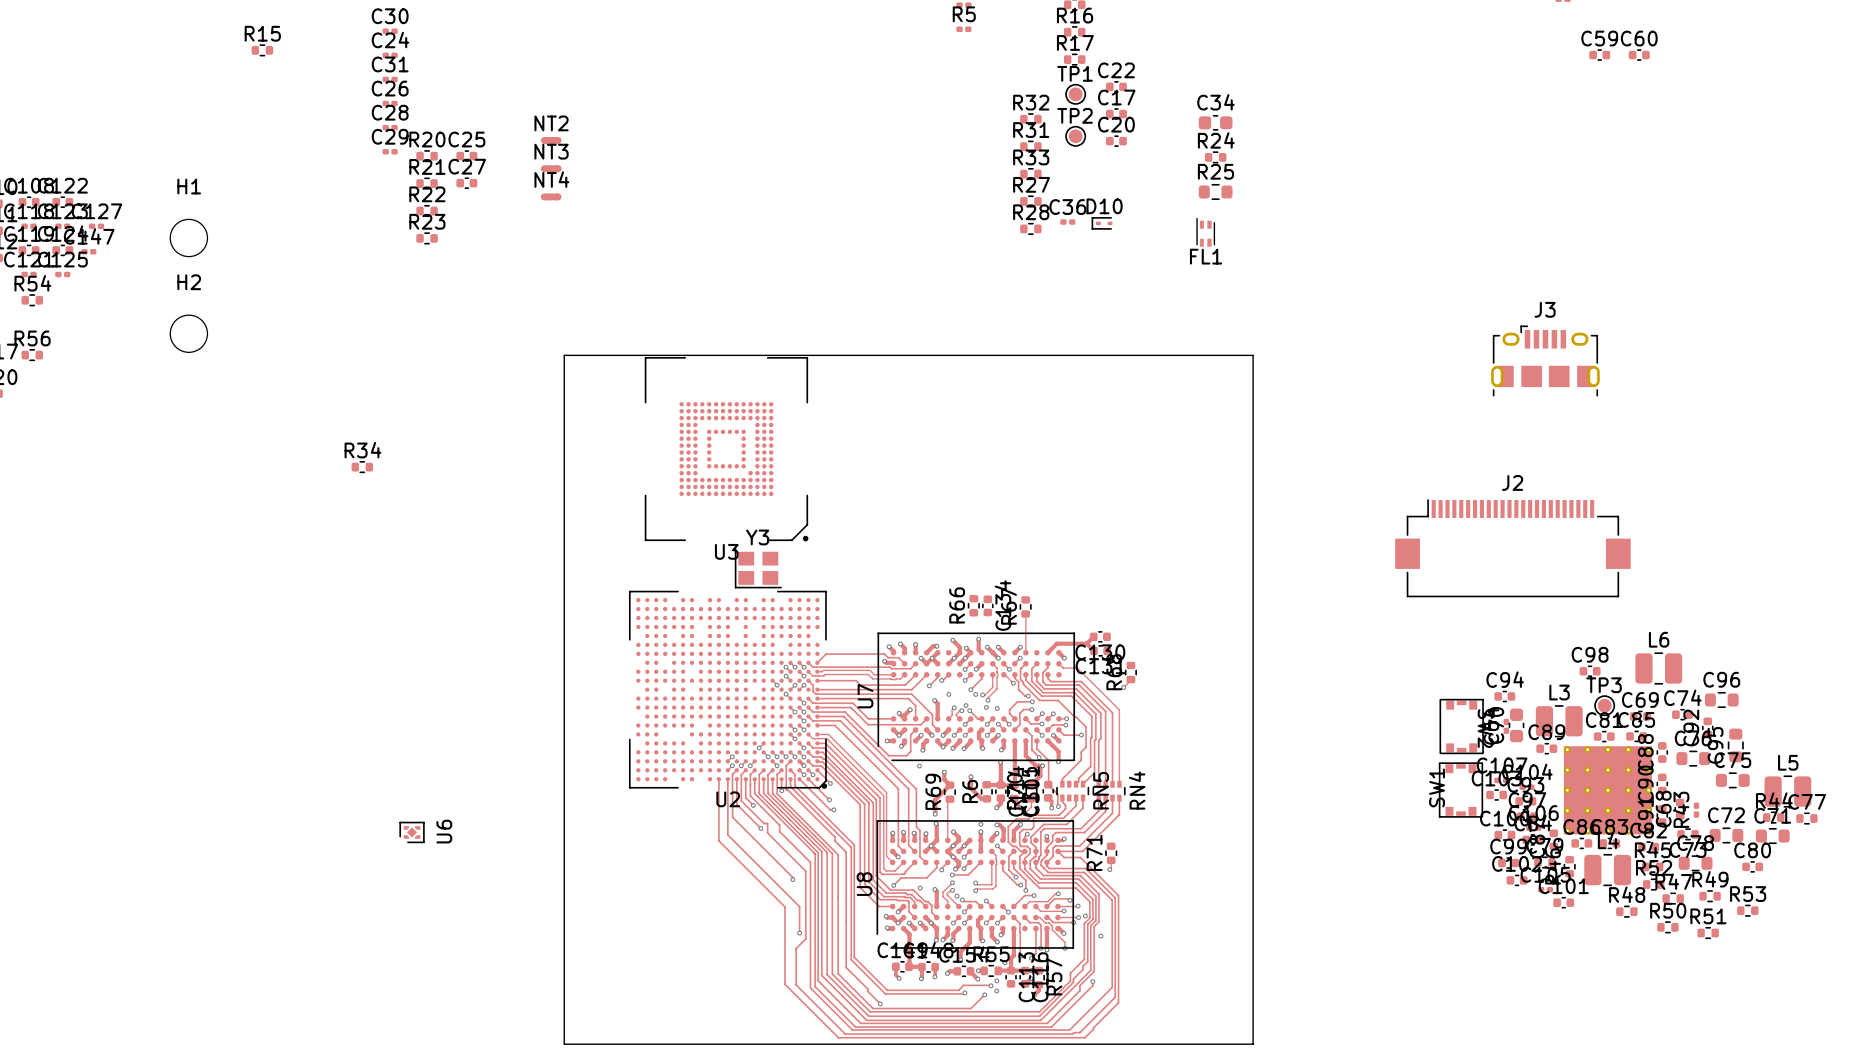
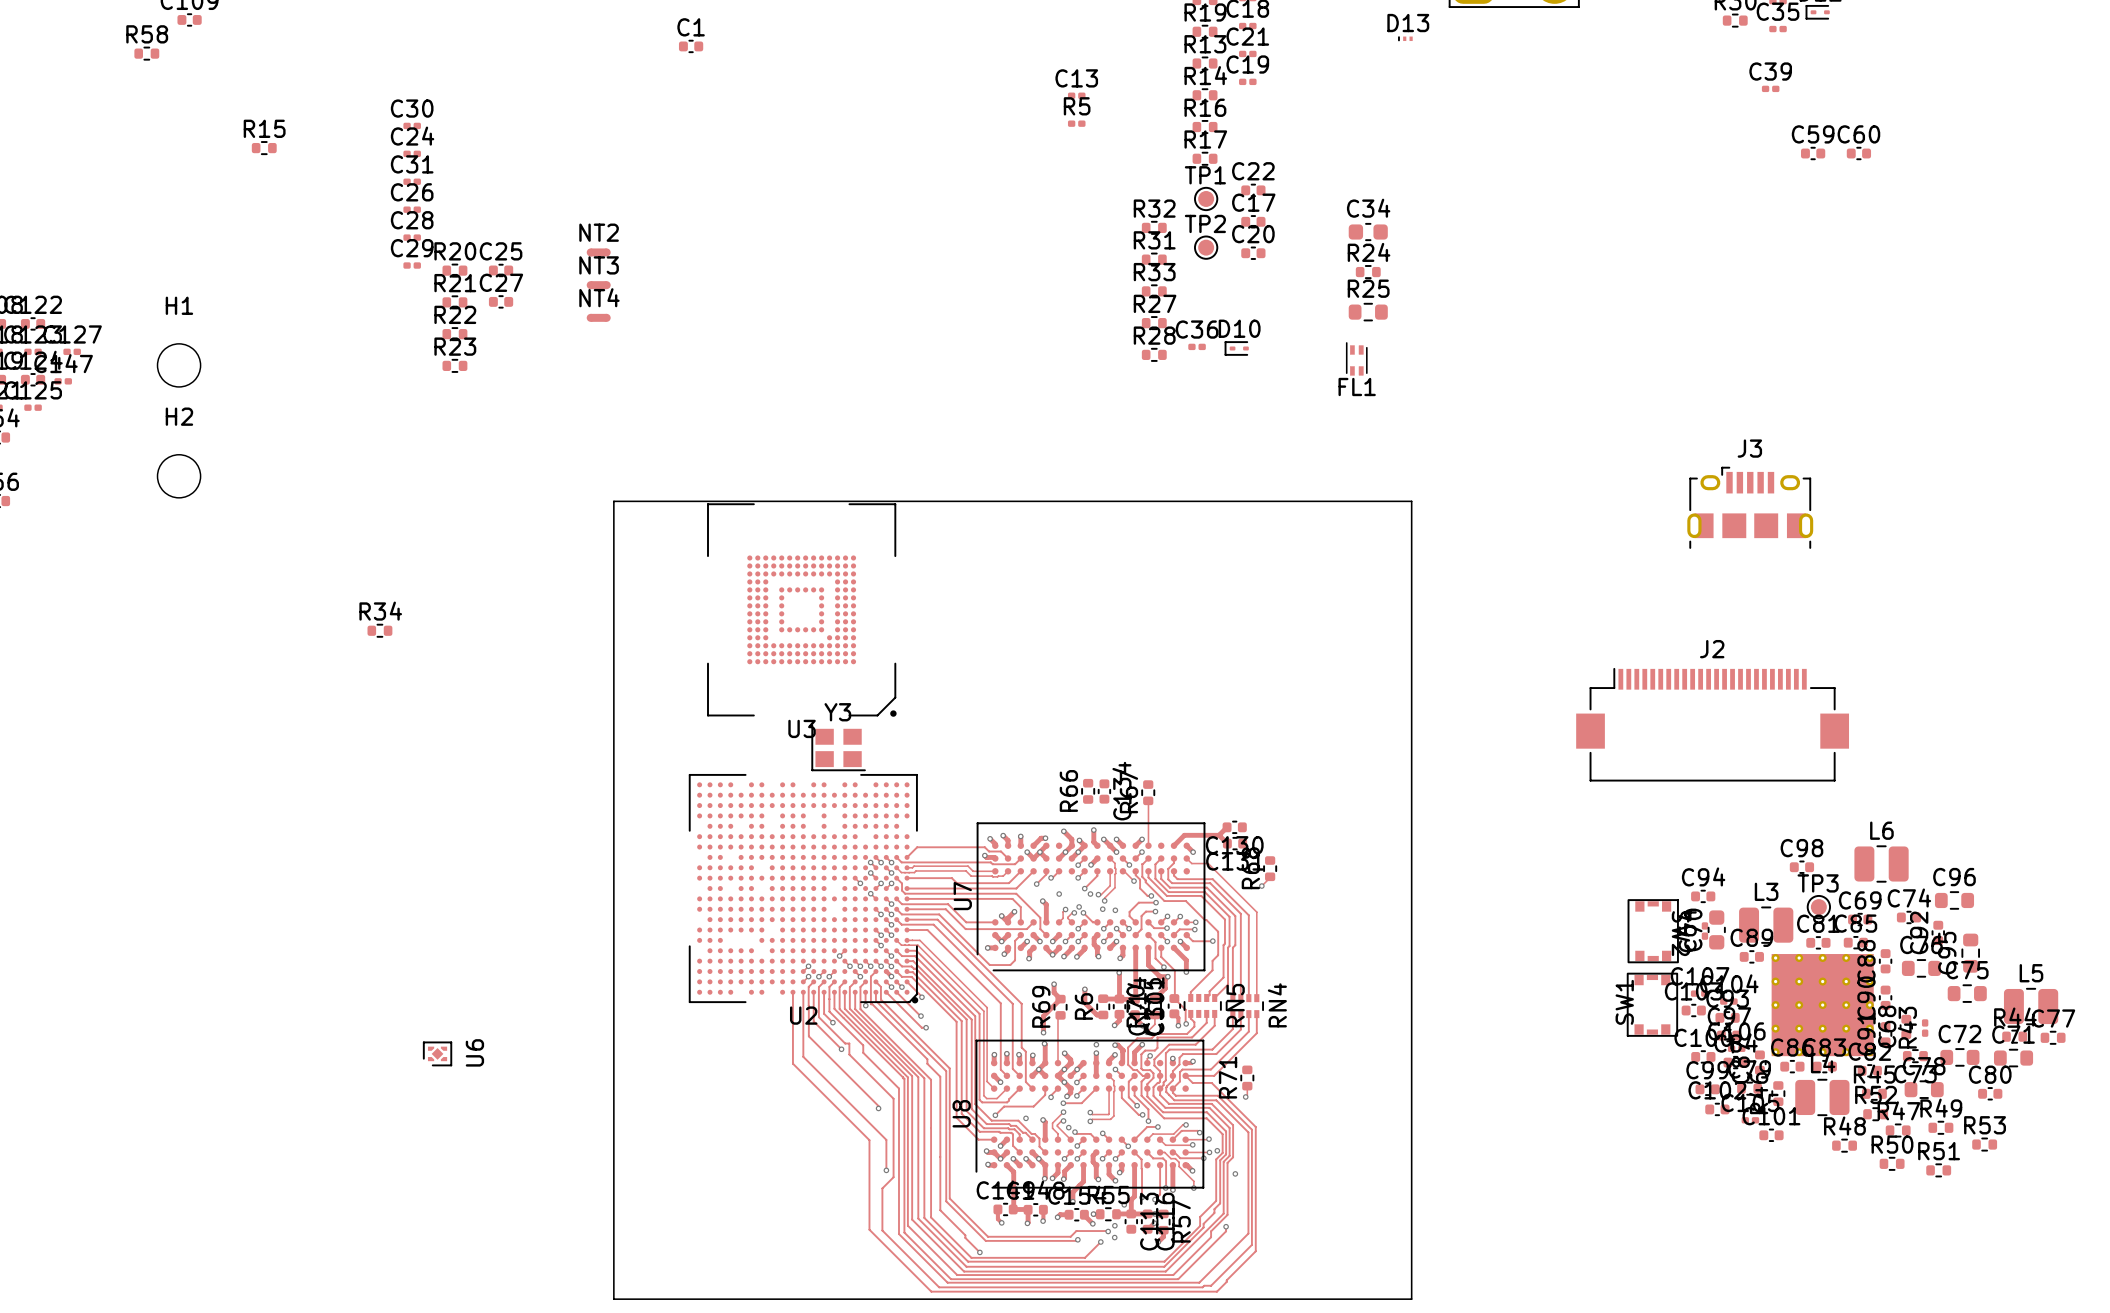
via: (919, 766) -> none

